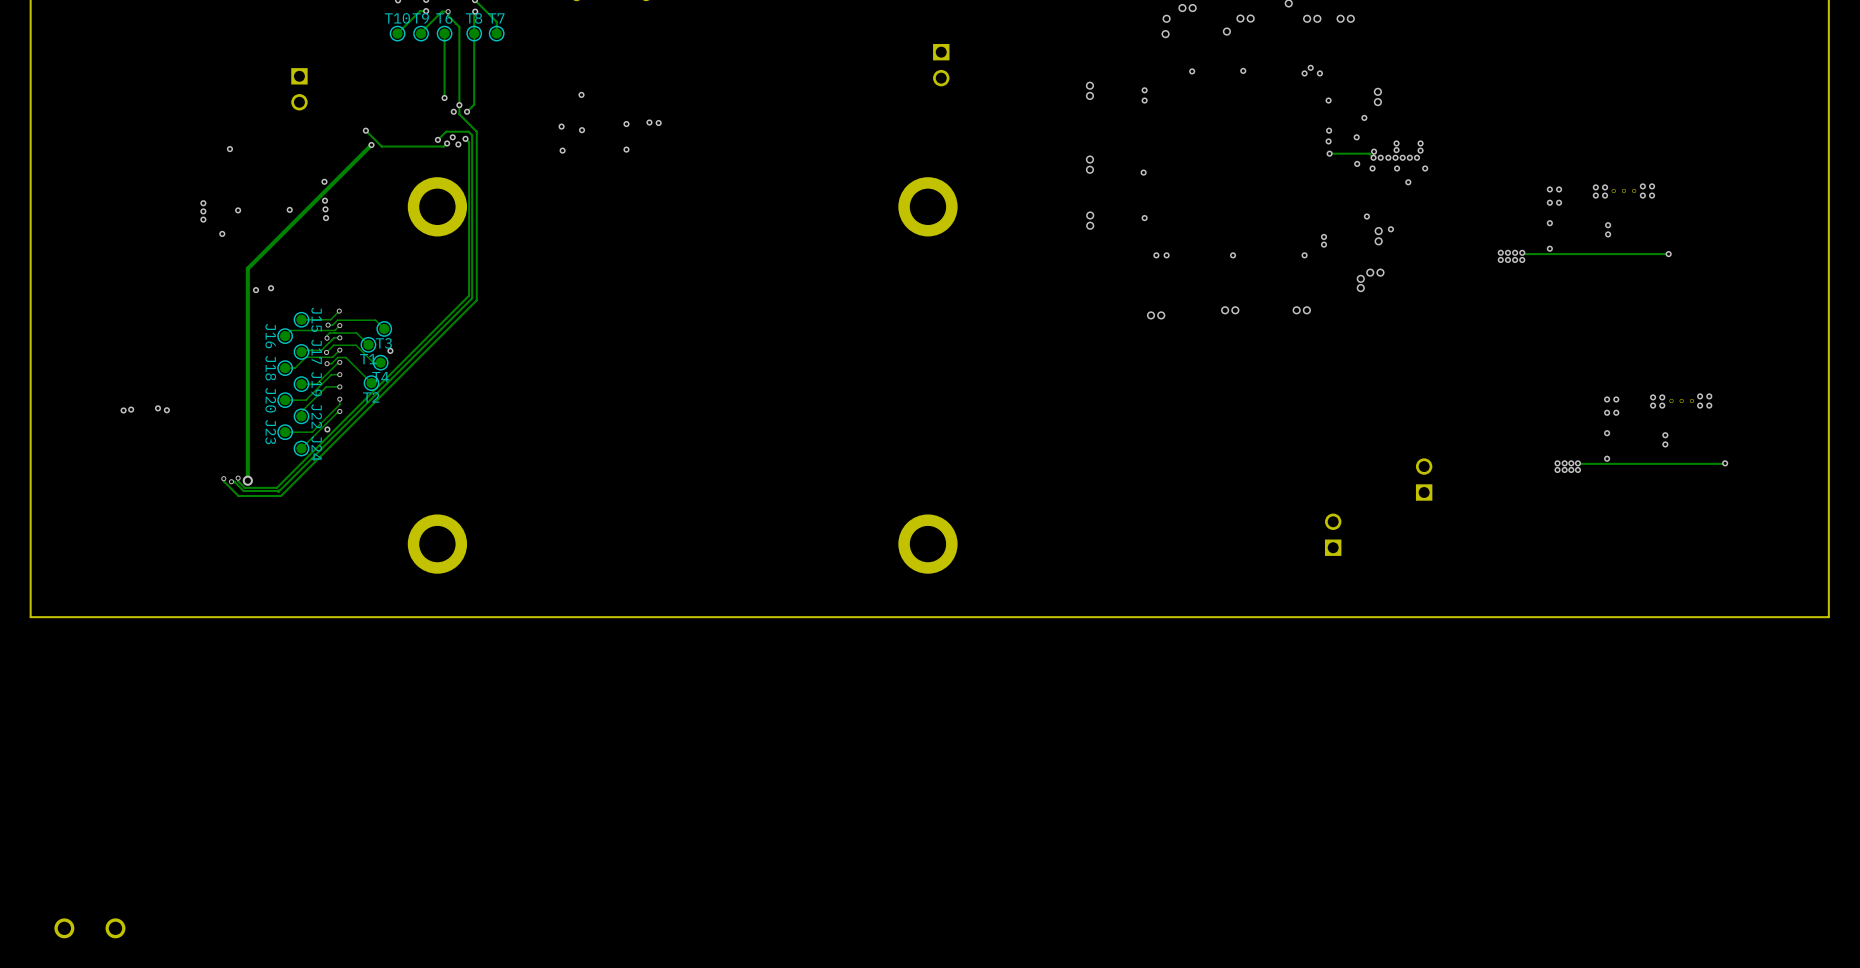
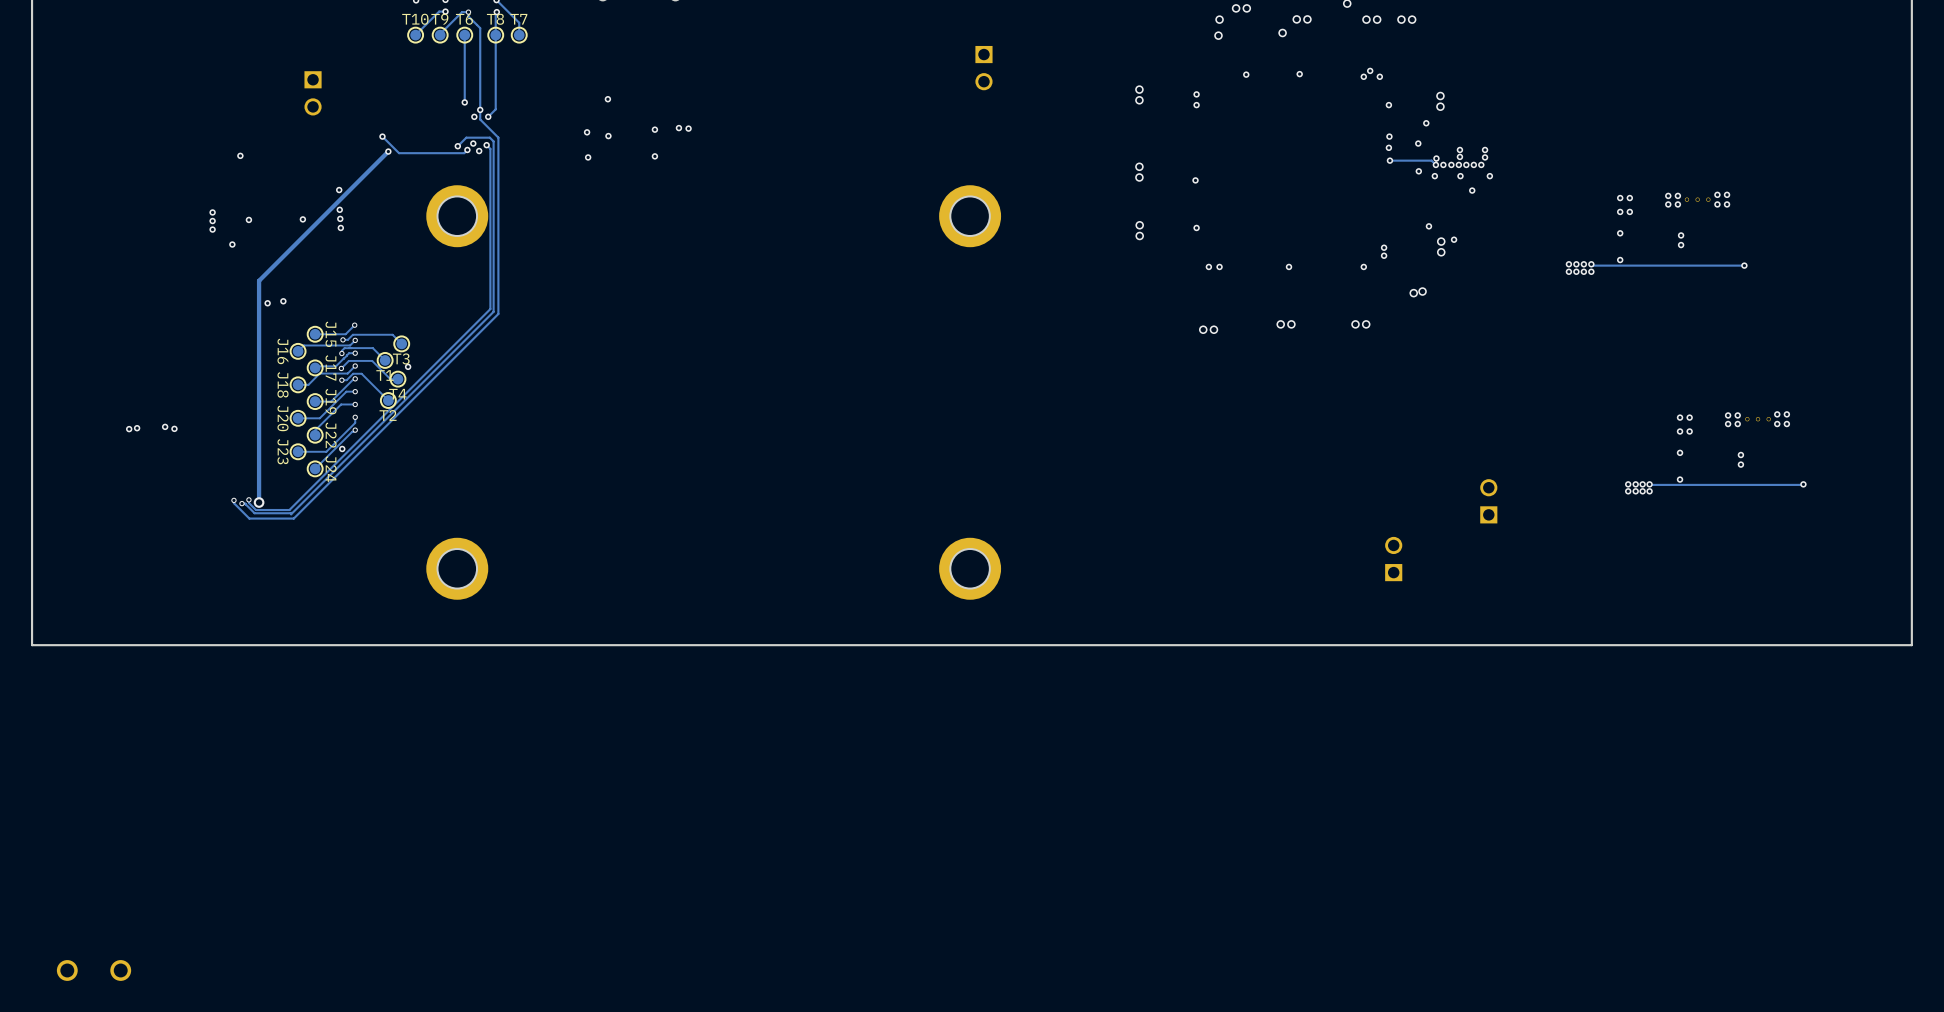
via: (1370, 272) -> none
via: (1380, 272) -> none
via: none -> (1413, 293)
via: (1360, 288) -> none

